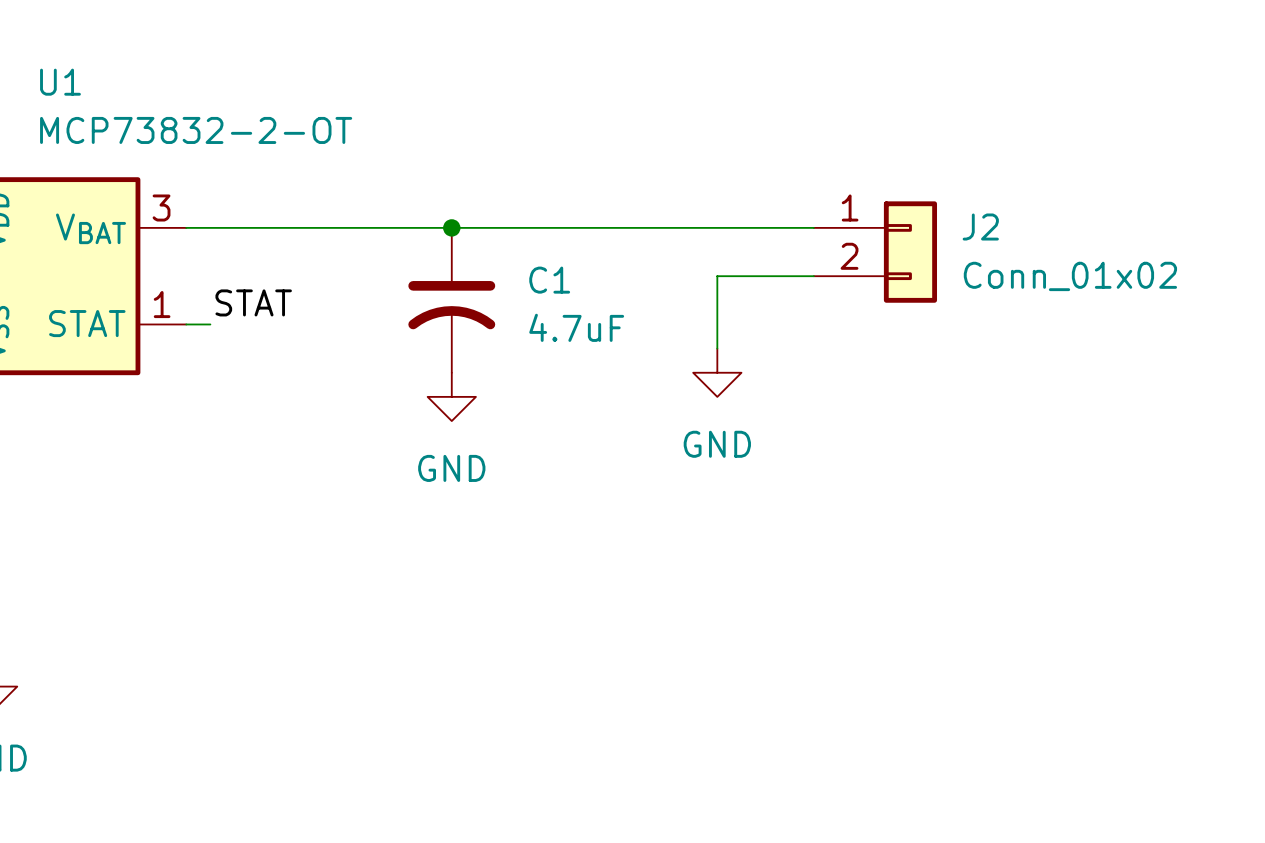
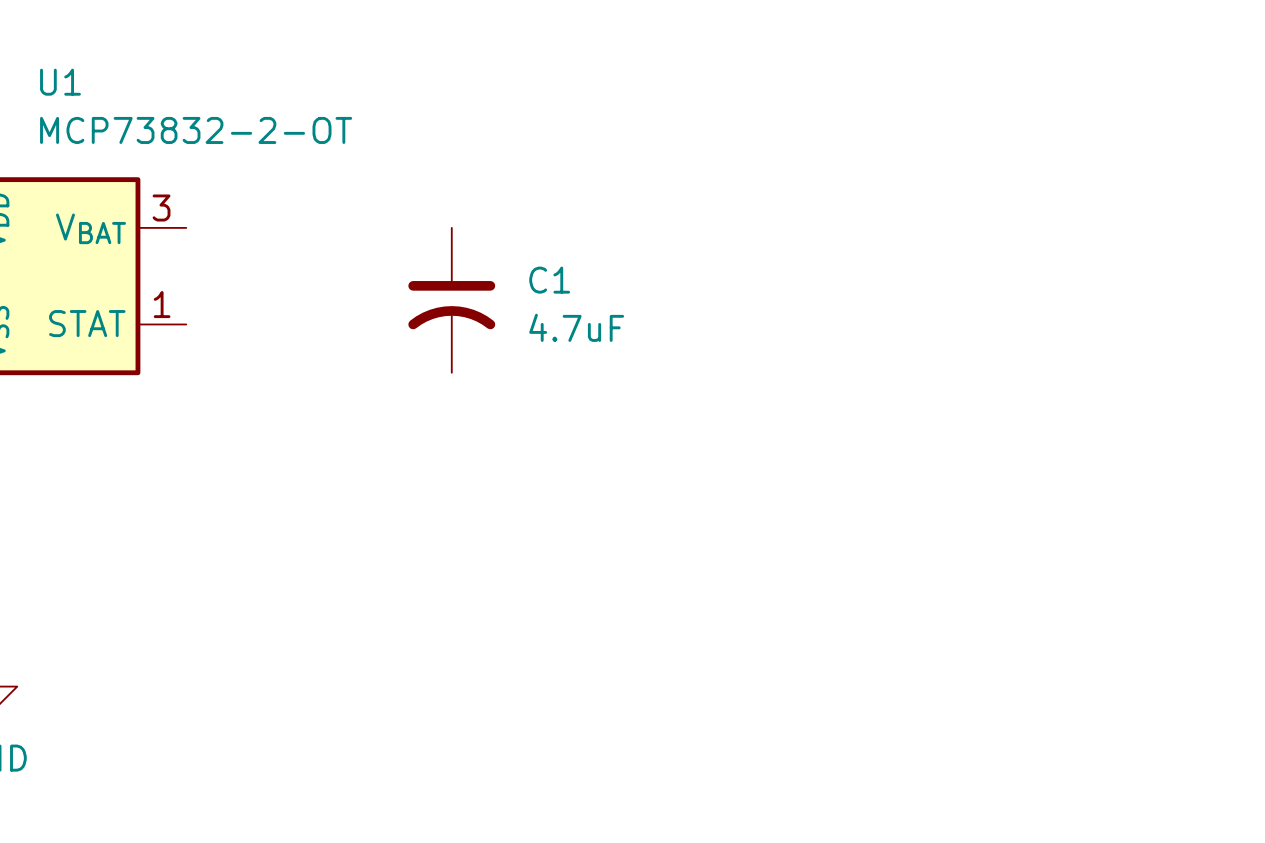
wire: (186, 227) (813, 227) -> none
junction: (451, 227) -> none
J2: Conn_01x02 (875, 252) -> none
wire: (813, 276) (717, 276) (717, 348) -> none
label: STAT (253, 302) -> none
wire: (186, 324) (210, 324) -> none
power symbol: GND (717, 372) -> none
power symbol: GND (451, 396) -> none

